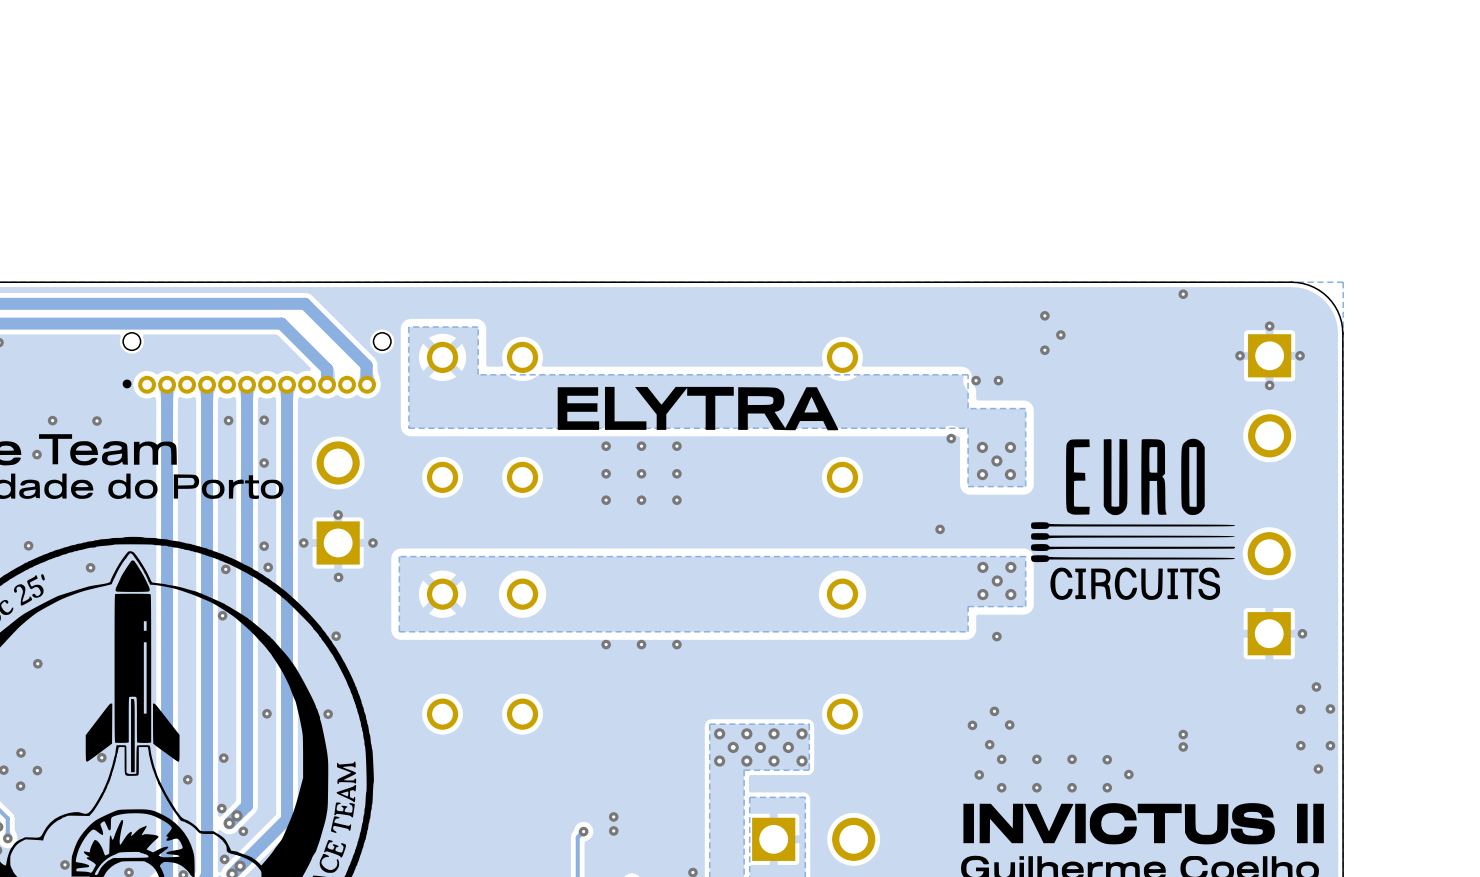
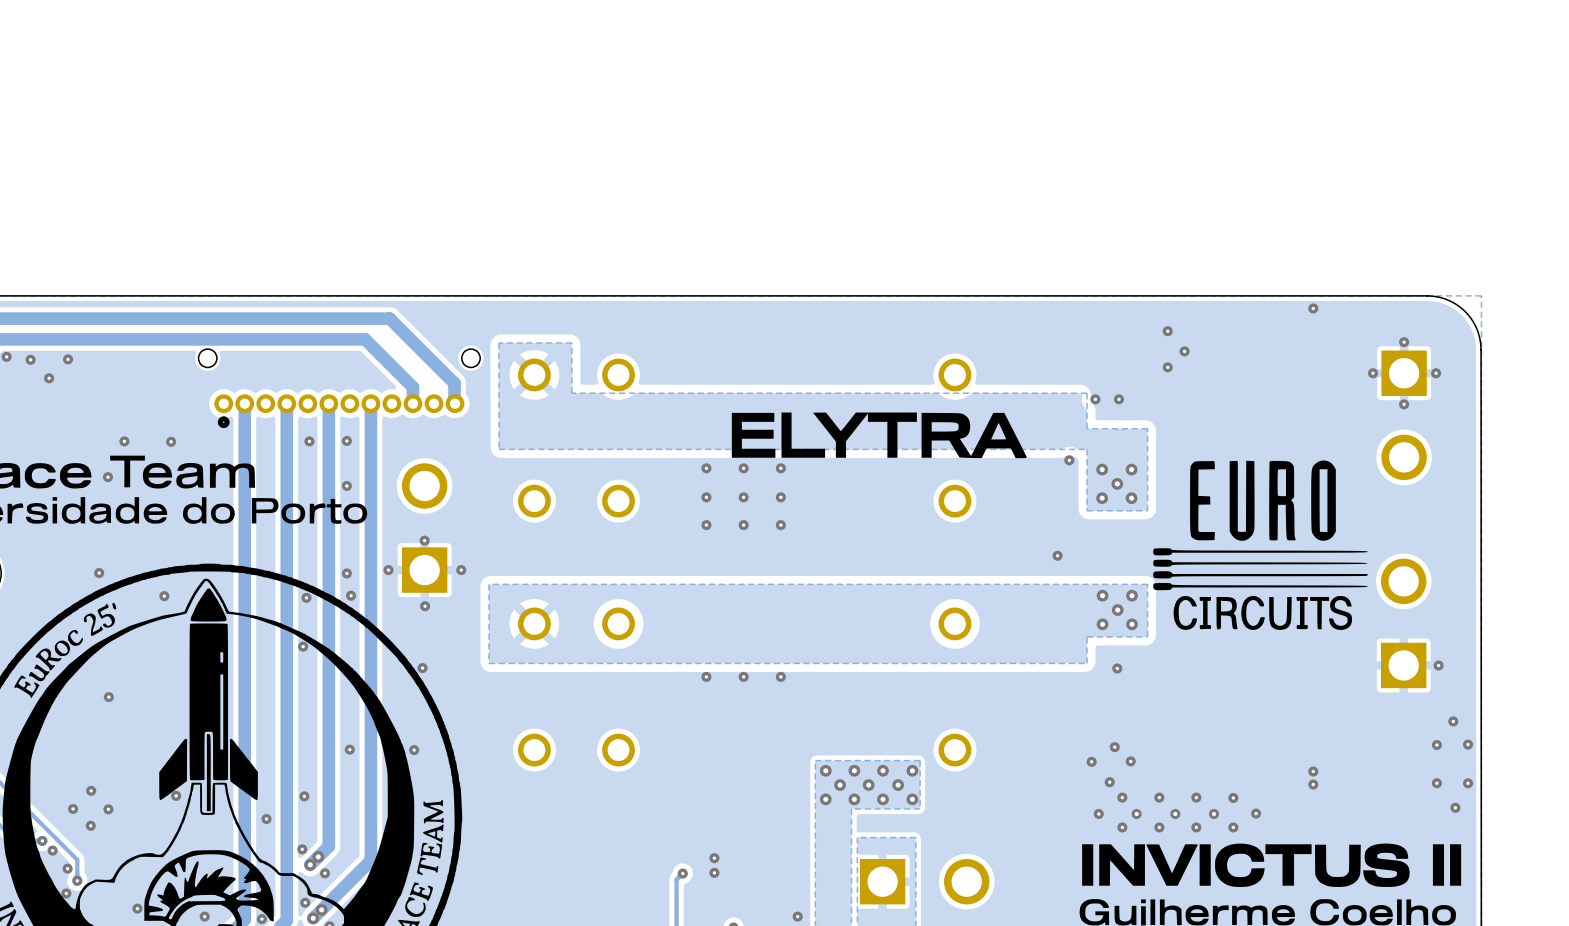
part footprint: [122, 332, 391, 394] -> [198, 349, 481, 429]
drawing position: (697, 408) -> (879, 435)
via: none -> (1136, 813)
via: none -> (1175, 813)
via: none -> (1214, 813)

